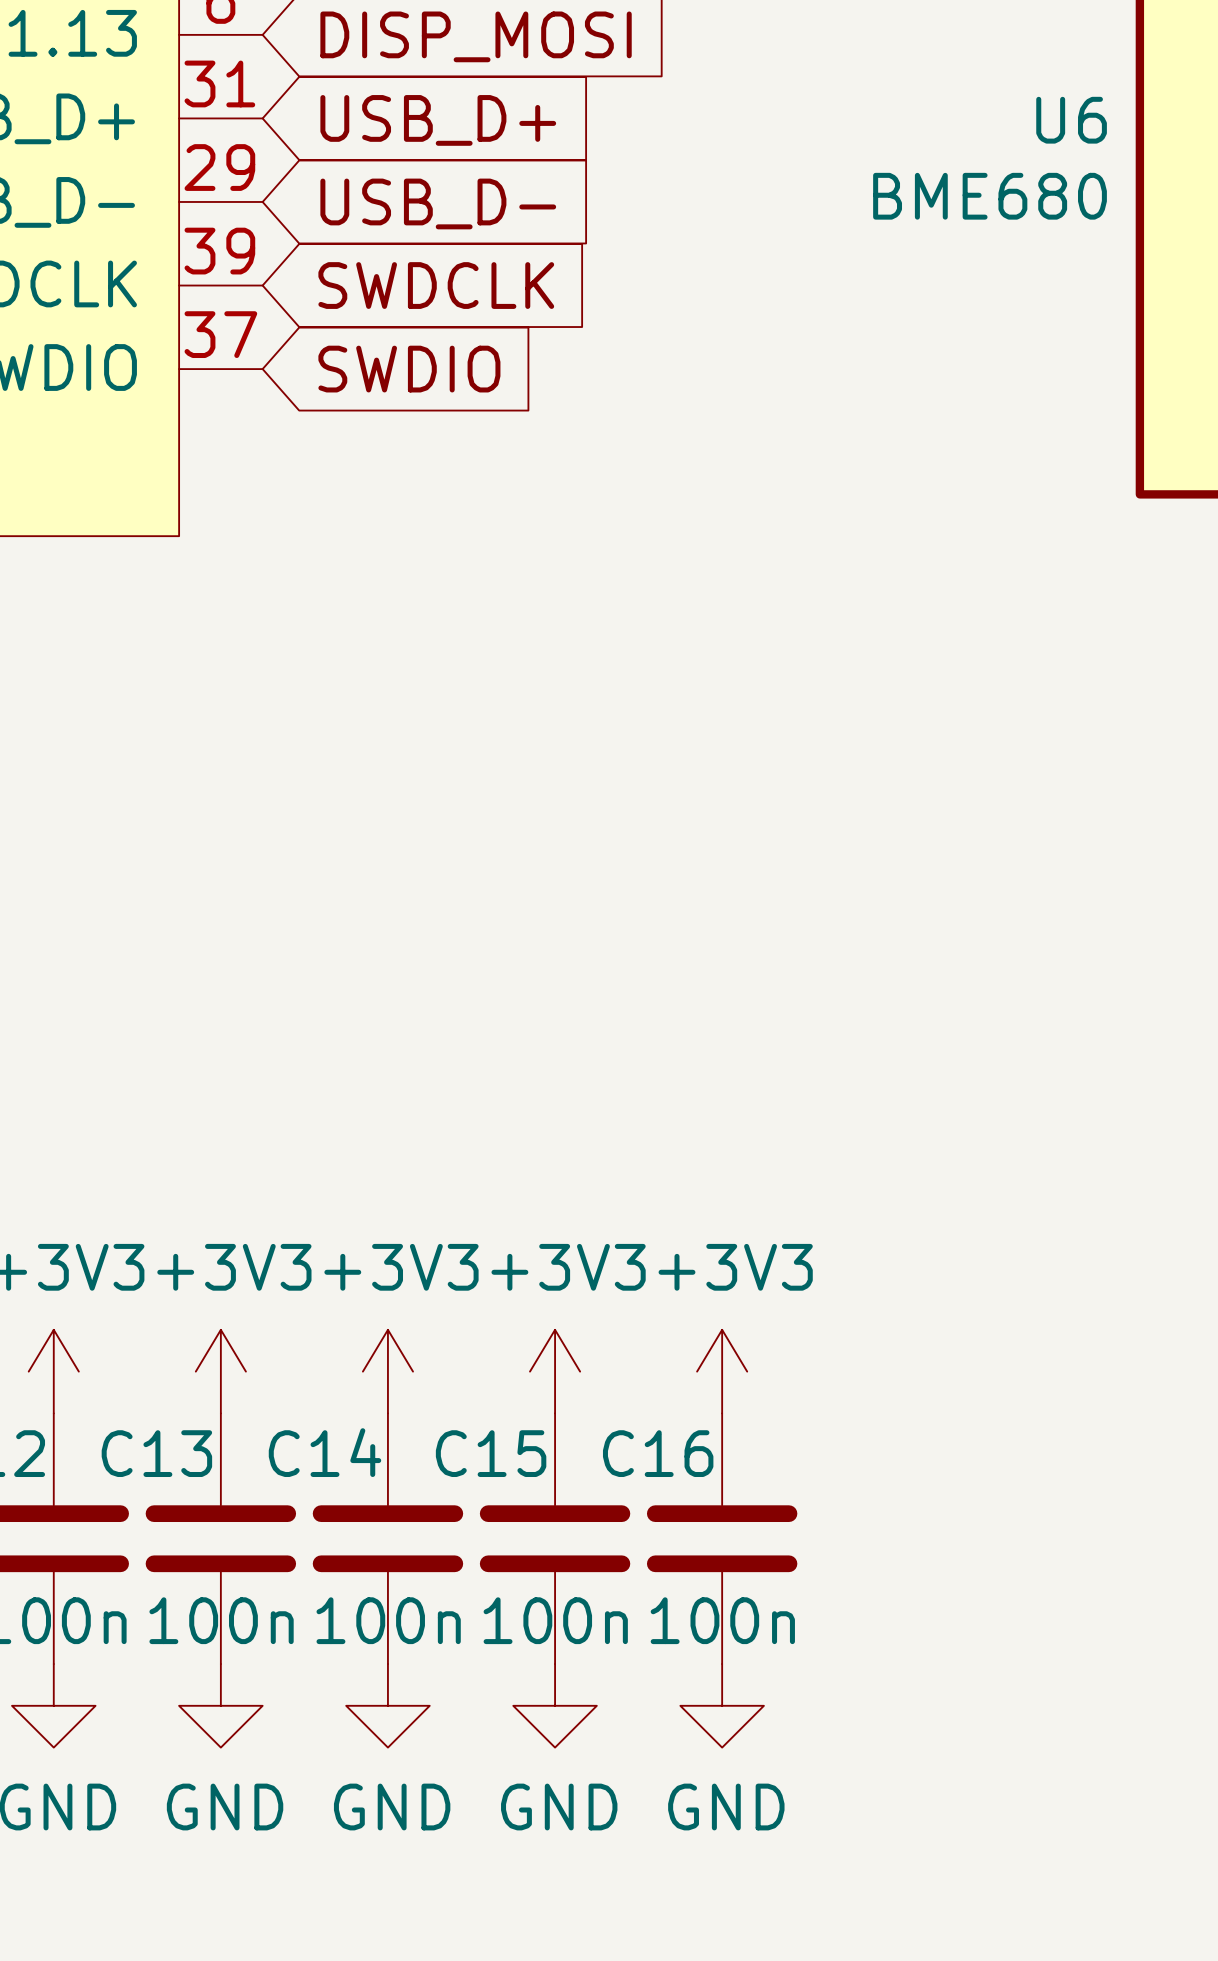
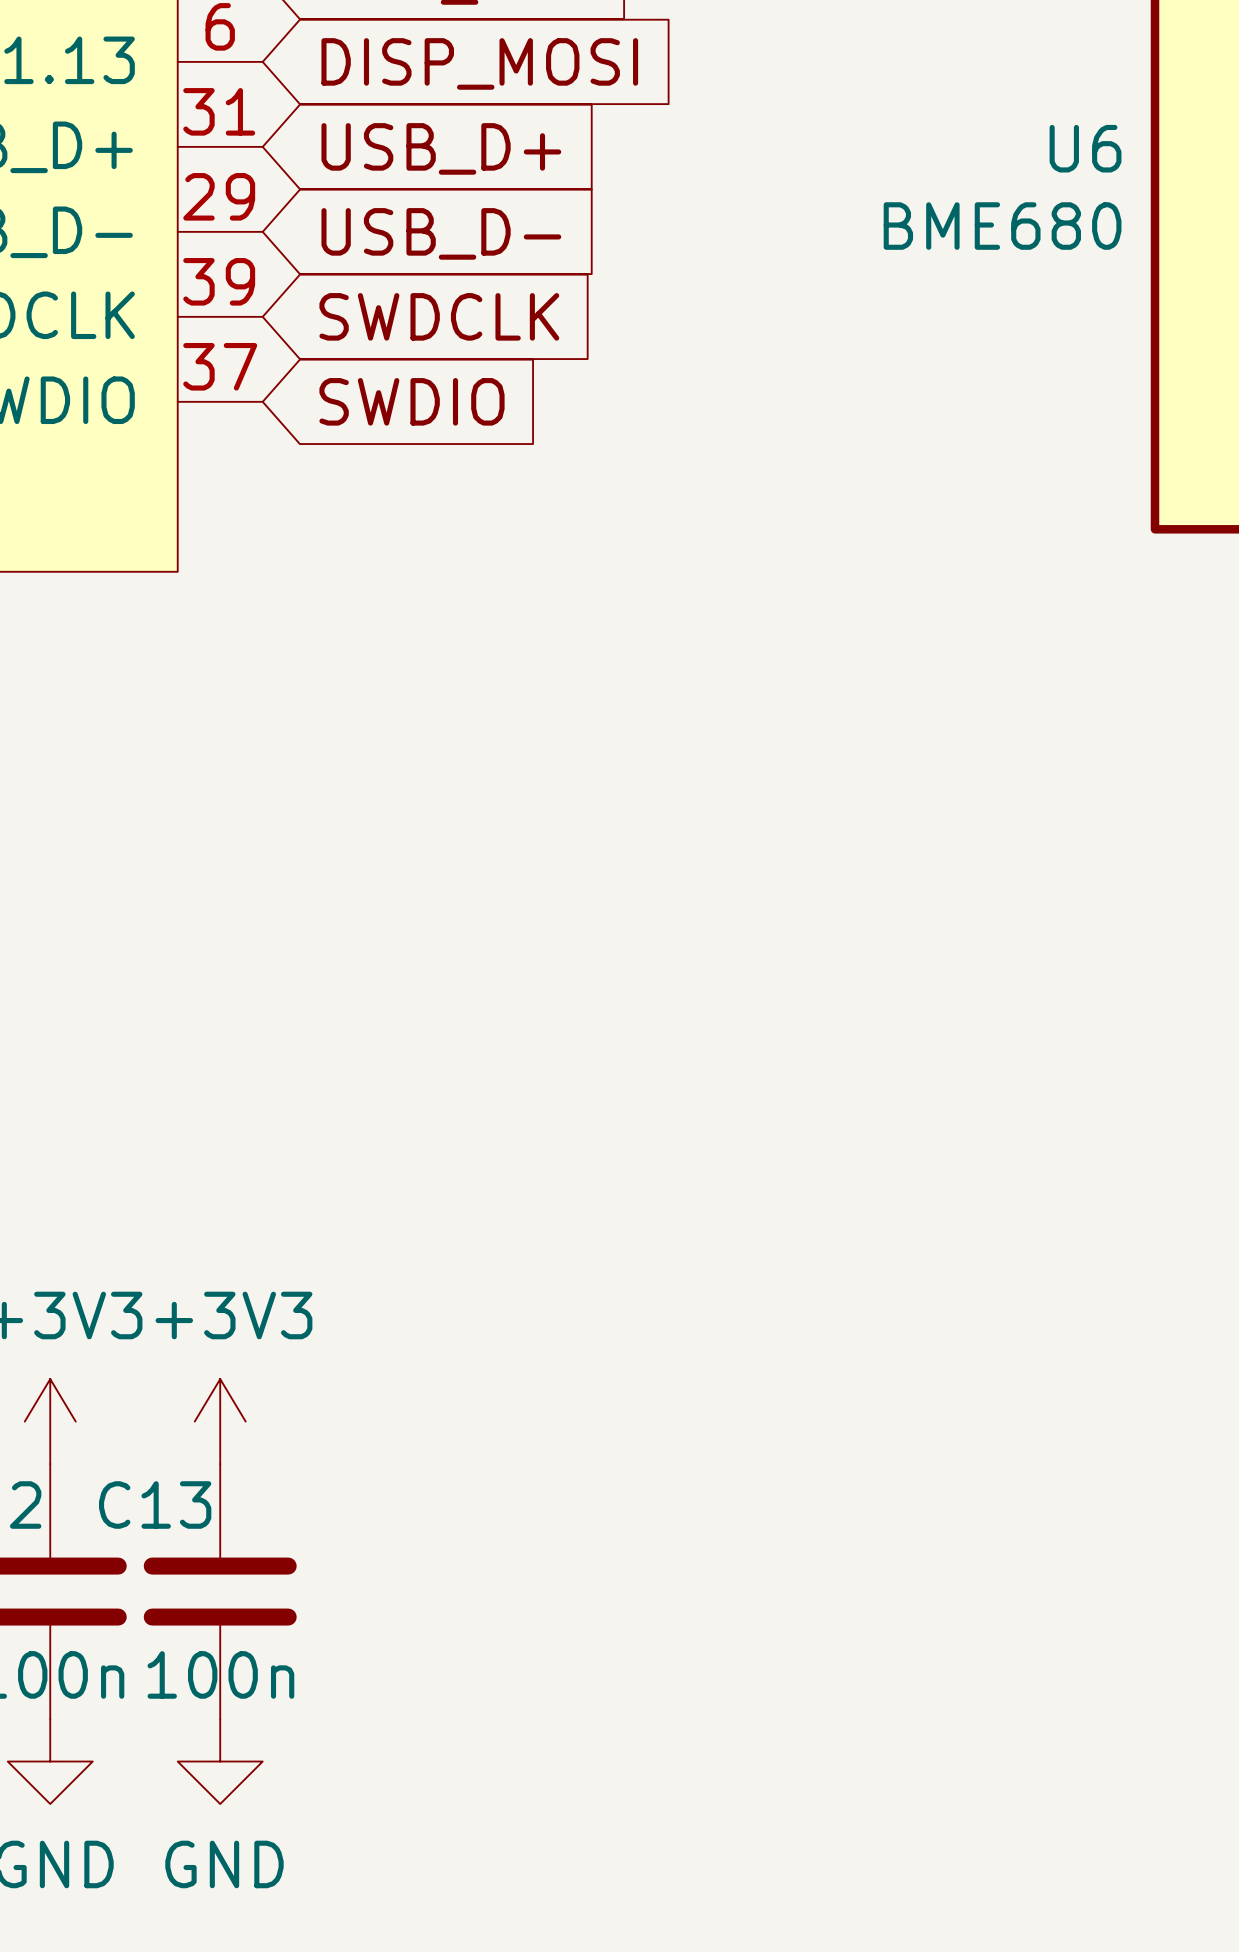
power symbol: +3V3 (387, 1371) -> none
power symbol: +3V3 (555, 1371) -> none
power symbol: +3V3 (722, 1371) -> none
C14: 100n (387, 1538) -> none
C15: 100n (555, 1538) -> none
C16: 100n (722, 1538) -> none
power symbol: GND (387, 1705) -> none
power symbol: GND (555, 1705) -> none
power symbol: GND (722, 1705) -> none

